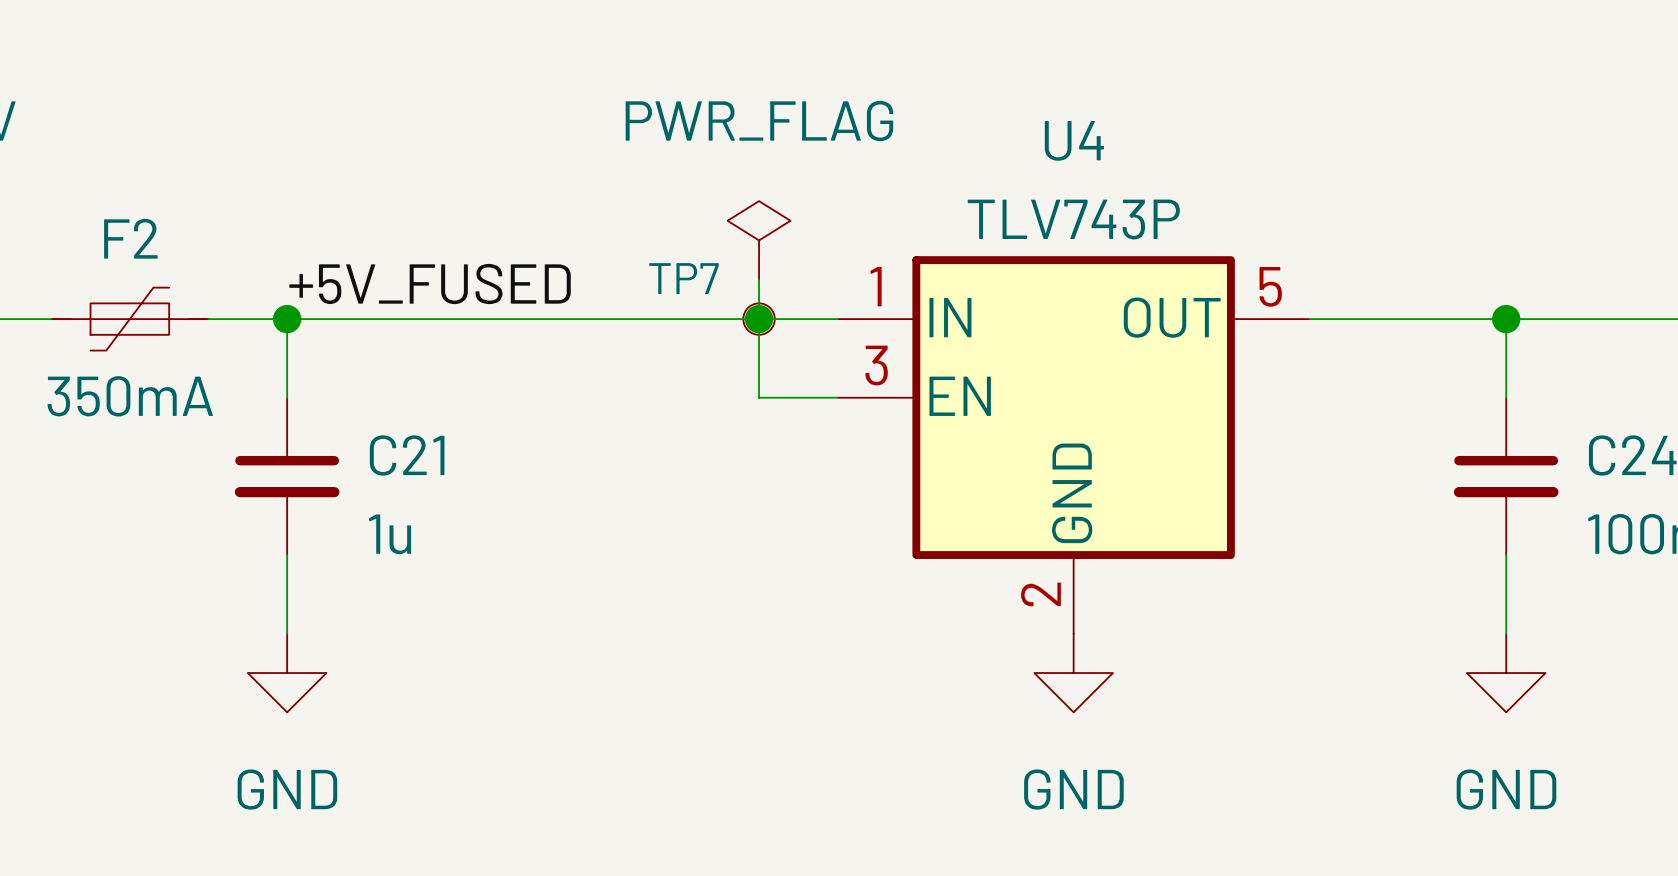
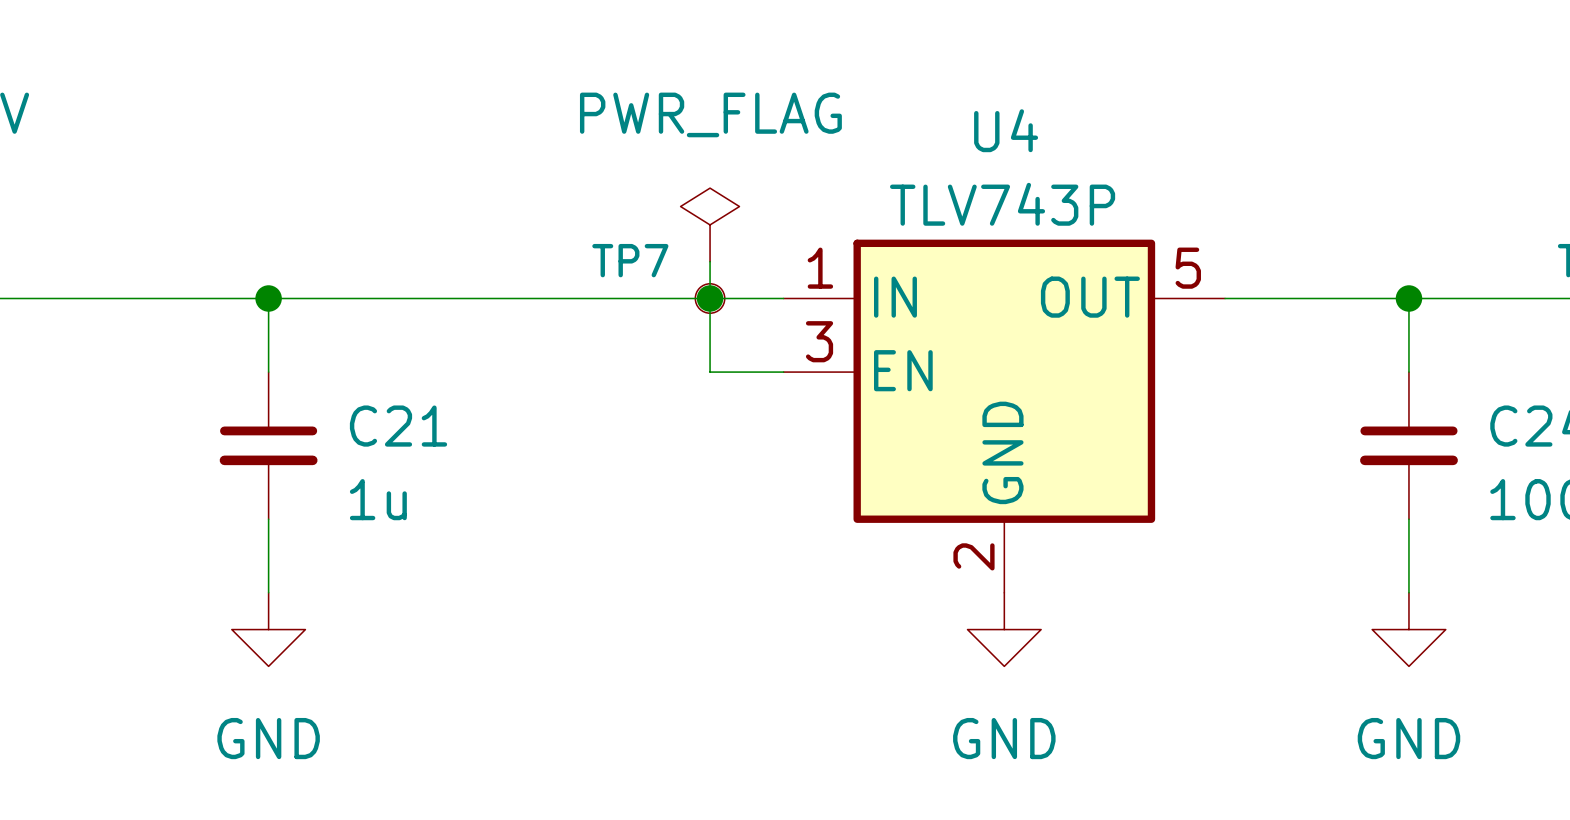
label: +5V_FUSED (430, 284) -> none
F2: 350mA (129, 319) -> none

